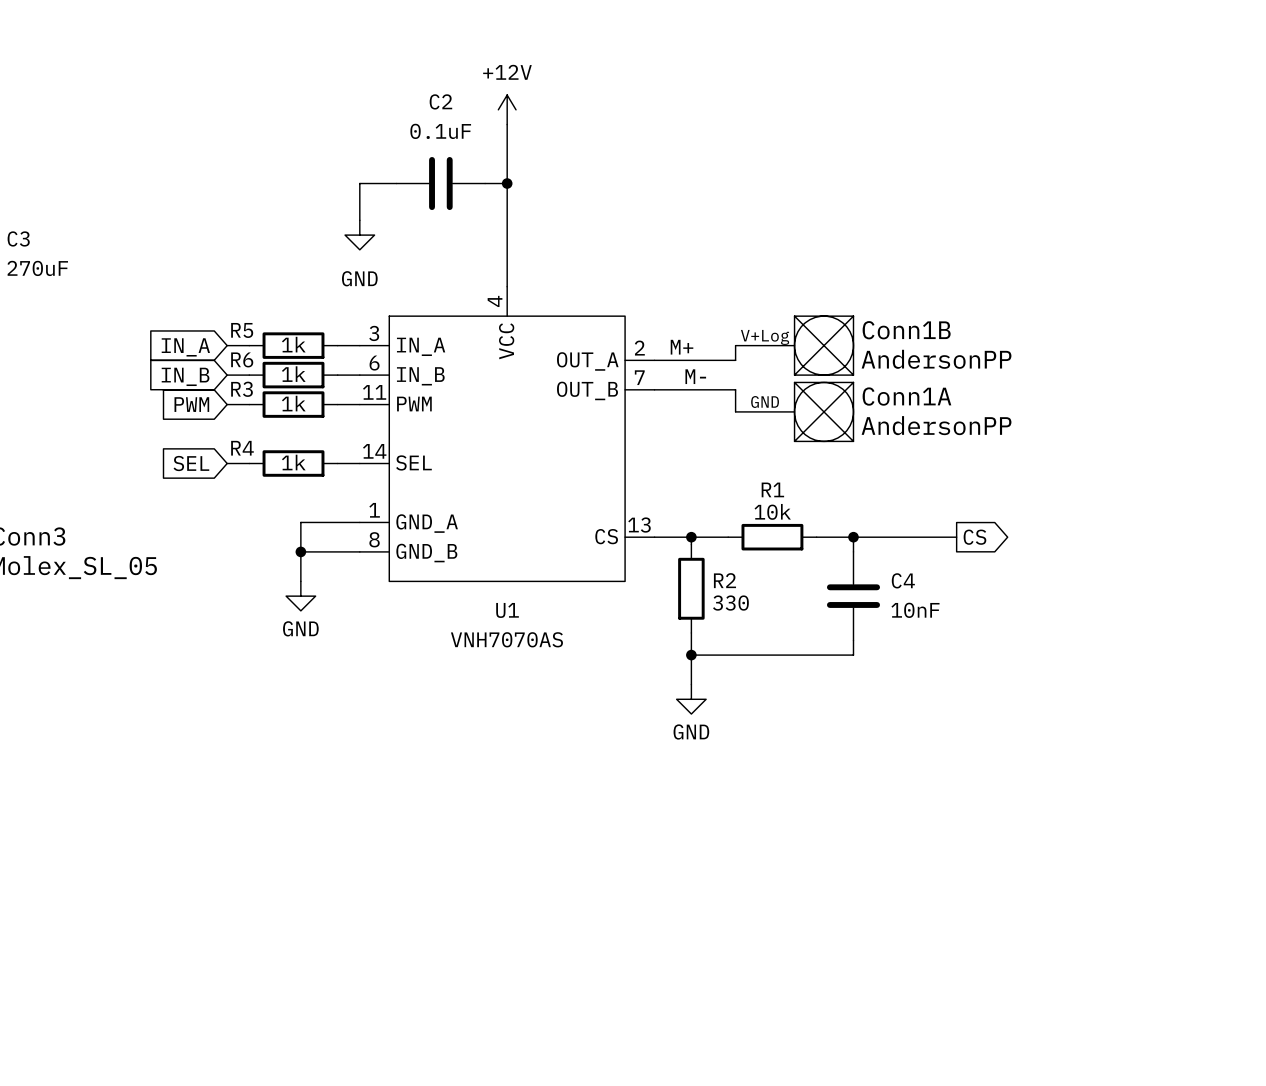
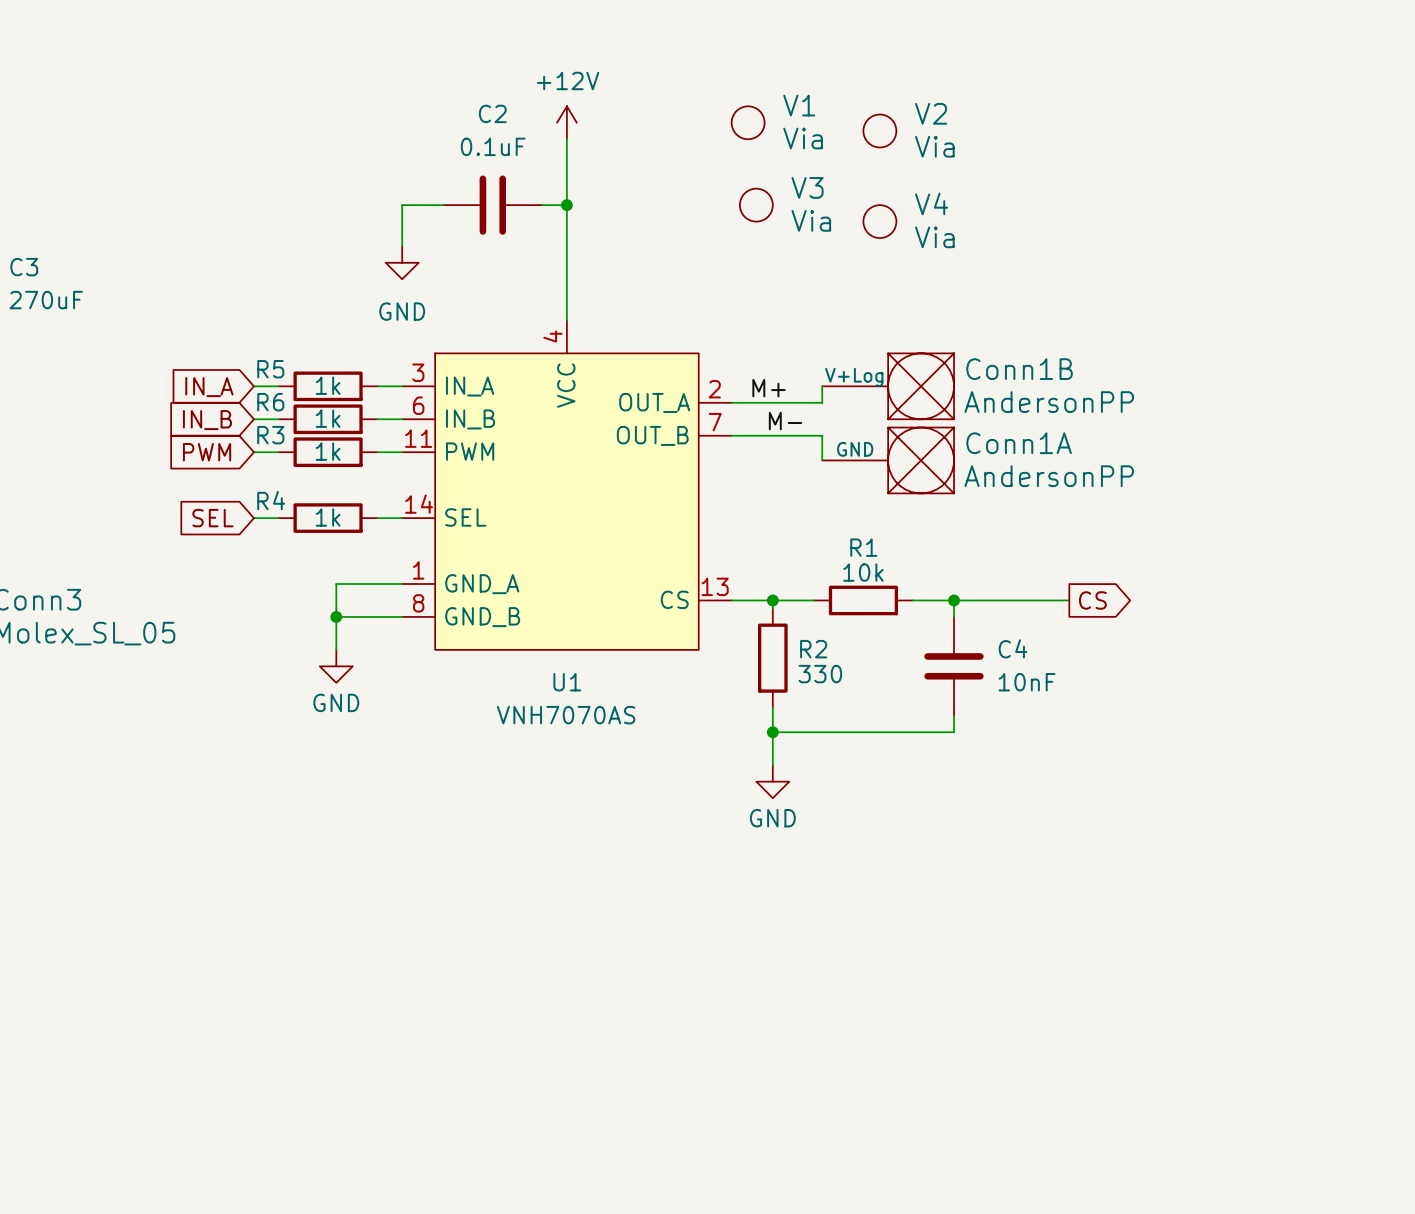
V1: none -> Via (748, 122)
V2: none -> Via (879, 131)
V3: none -> Via (756, 205)
V4: none -> Via (879, 221)

